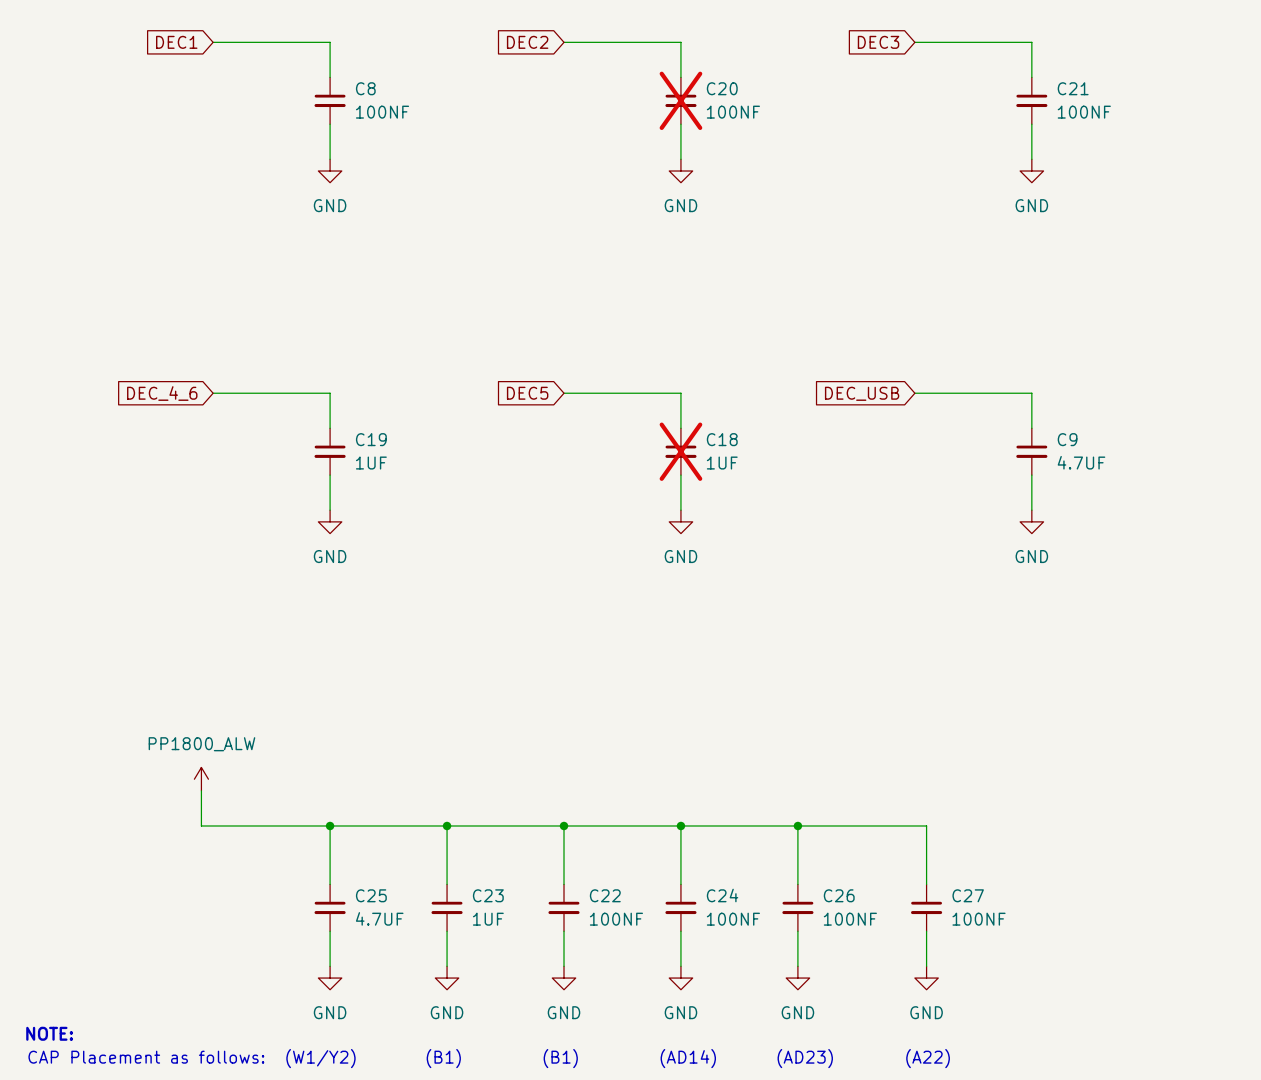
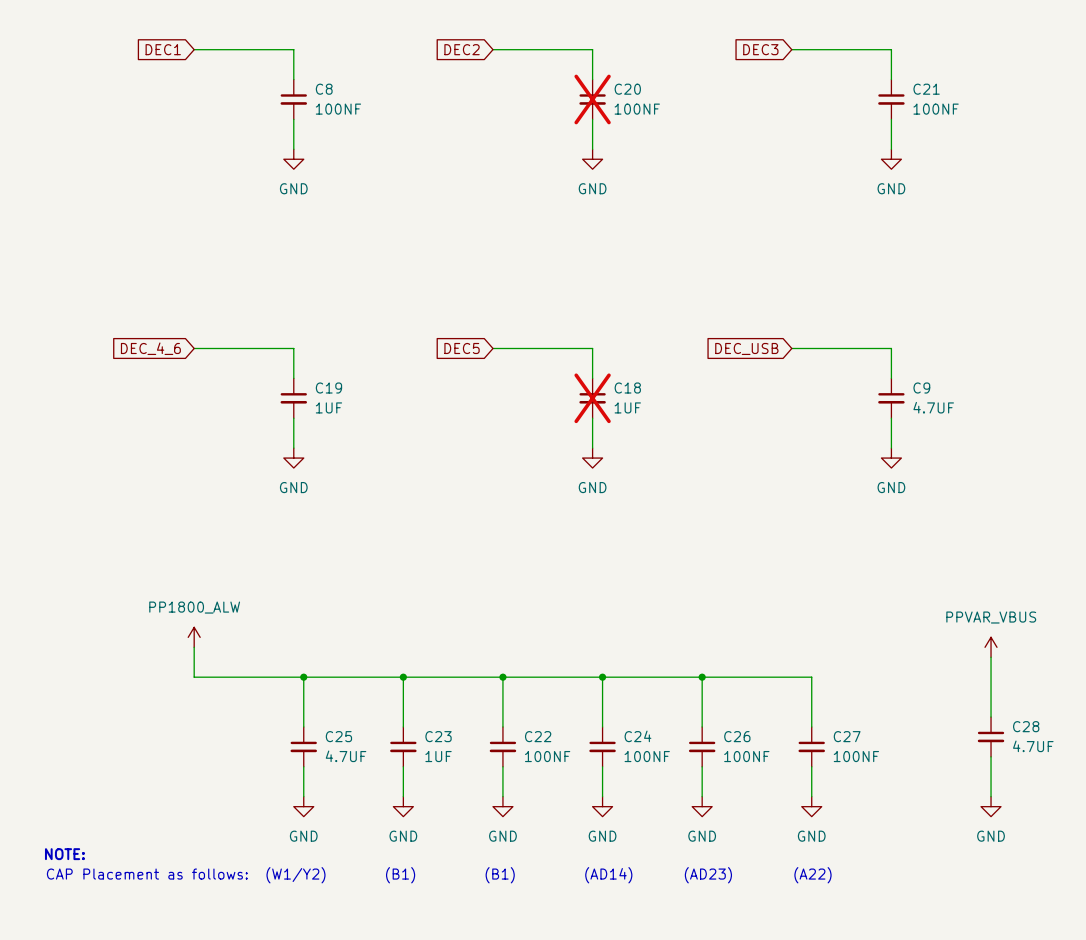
power symbol: none -> PPVAR_VBUS (991, 647)
wire: none -> (991, 657) (991, 717)
power symbol position: PP1800_ALW (201, 779) -> PP1800_ALW (194, 637)
wire: (201, 790) (201, 825) (926, 825) (926, 884) -> (194, 647) (194, 677) (811, 677) (811, 726)
wire: (330, 825) (330, 884) -> (303, 677) (303, 726)
junction position: (330, 825) -> (303, 677)
wire: (447, 825) (447, 884) -> (403, 677) (403, 726)
junction position: (447, 825) -> (403, 677)
wire: (564, 825) (564, 884) -> (502, 677) (502, 726)
junction position: (564, 825) -> (502, 677)
wire: (680, 825) (680, 884) -> (602, 677) (602, 726)
junction position: (680, 825) -> (602, 677)
wire: (797, 825) (797, 884) -> (702, 677) (702, 726)
junction position: (797, 825) -> (702, 677)
C28: none -> 4.7UF (991, 736)
wire: none -> (991, 756) (991, 796)
C25 position: (330, 907) -> (303, 746)
C23 position: (447, 907) -> (403, 746)
C22 position: (564, 907) -> (502, 746)
C24 position: (680, 907) -> (602, 746)
C26 position: (797, 907) -> (702, 746)
C27 position: (926, 907) -> (811, 746)
wire: (330, 931) (330, 966) -> (303, 766) (303, 796)
wire: (447, 931) (447, 966) -> (403, 766) (403, 796)
wire: (564, 931) (564, 966) -> (502, 766) (502, 796)
wire: (680, 931) (680, 966) -> (602, 766) (602, 796)
wire: (797, 931) (797, 966) -> (702, 766) (702, 796)
wire: (926, 931) (926, 966) -> (811, 766) (811, 796)
power symbol: none -> GND (991, 806)
power symbol position: GND (330, 978) -> GND (303, 806)
power symbol position: GND (447, 978) -> GND (403, 806)
power symbol position: GND (564, 978) -> GND (502, 806)
power symbol position: GND (680, 978) -> GND (602, 806)
power symbol position: GND (797, 978) -> GND (702, 806)
power symbol position: GND (926, 978) -> GND (811, 806)
text position: NOTE: (49, 1033) -> NOTE: (64, 854)
text position: CAP Placement as follows: (146, 1057) -> CAP Placement as follows: (147, 874)
text position: (W1/Y2) (320, 1058) -> (W1/Y2) (296, 875)
text position: (B1) (443, 1058) -> (B1) (400, 875)
text position: (B1) (560, 1058) -> (B1) (500, 875)
text position: (AD14) (688, 1058) -> (AD14) (608, 875)
text position: (AD23) (805, 1058) -> (AD23) (708, 875)
text position: (A22) (928, 1058) -> (A22) (812, 875)

